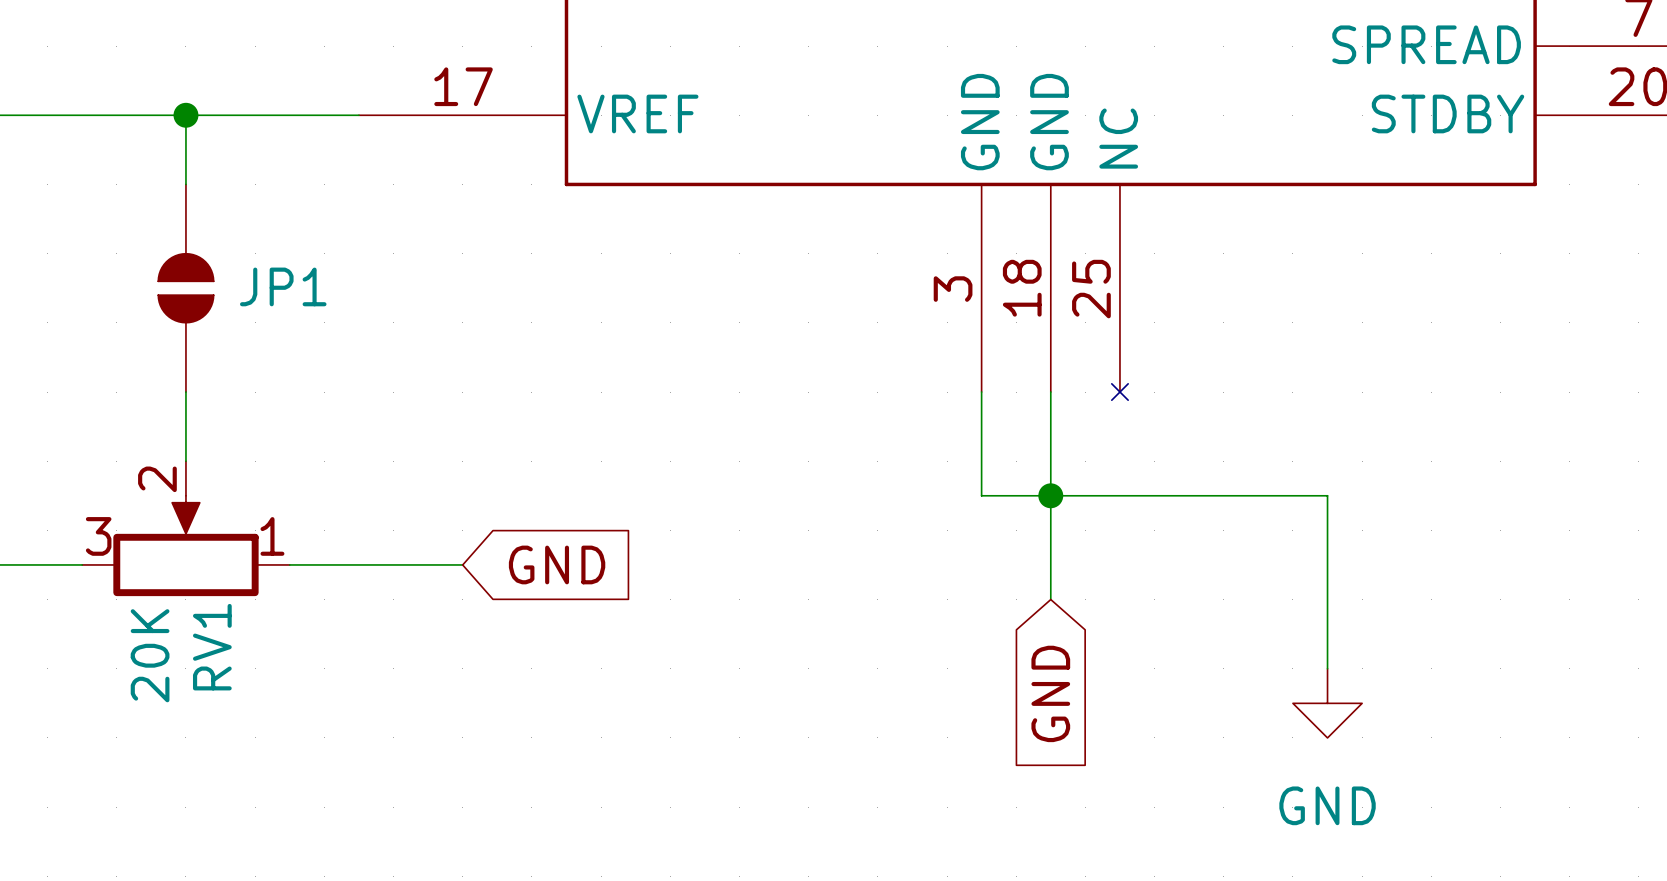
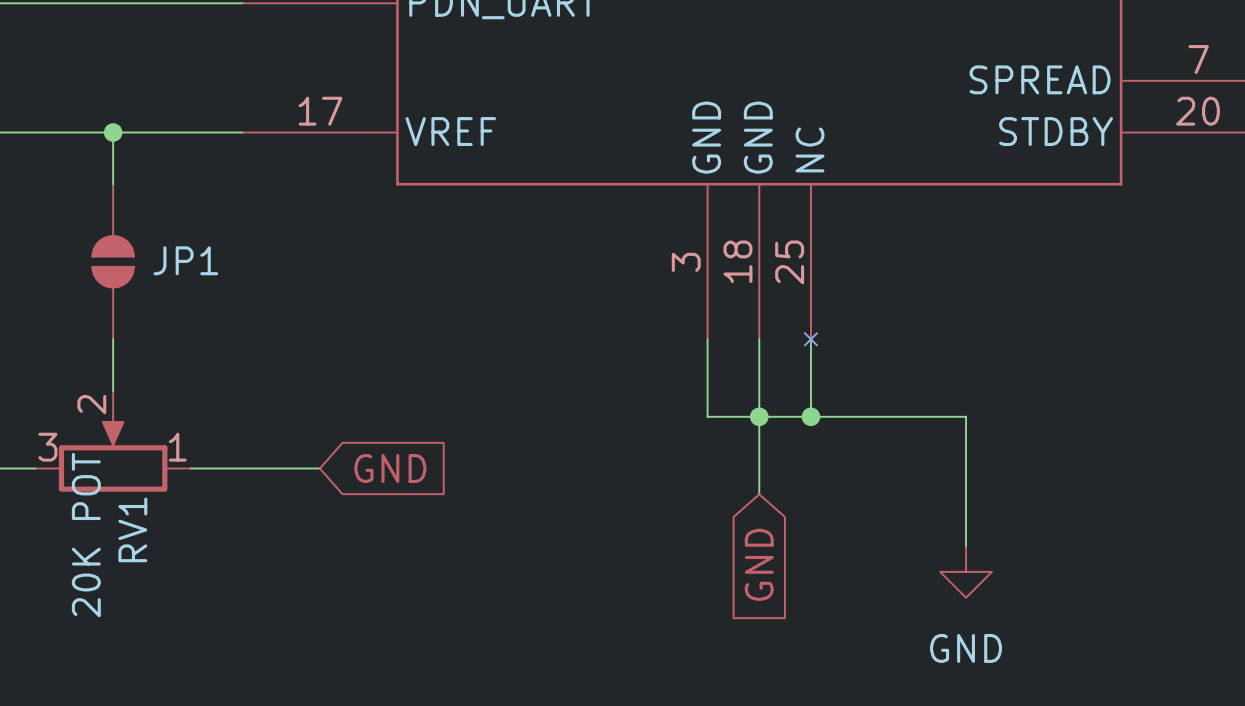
wire: none -> (810, 339) (810, 416)
junction: none -> (810, 416)
RV1 value: 20K (150, 655) -> 20K POT (86, 535)

